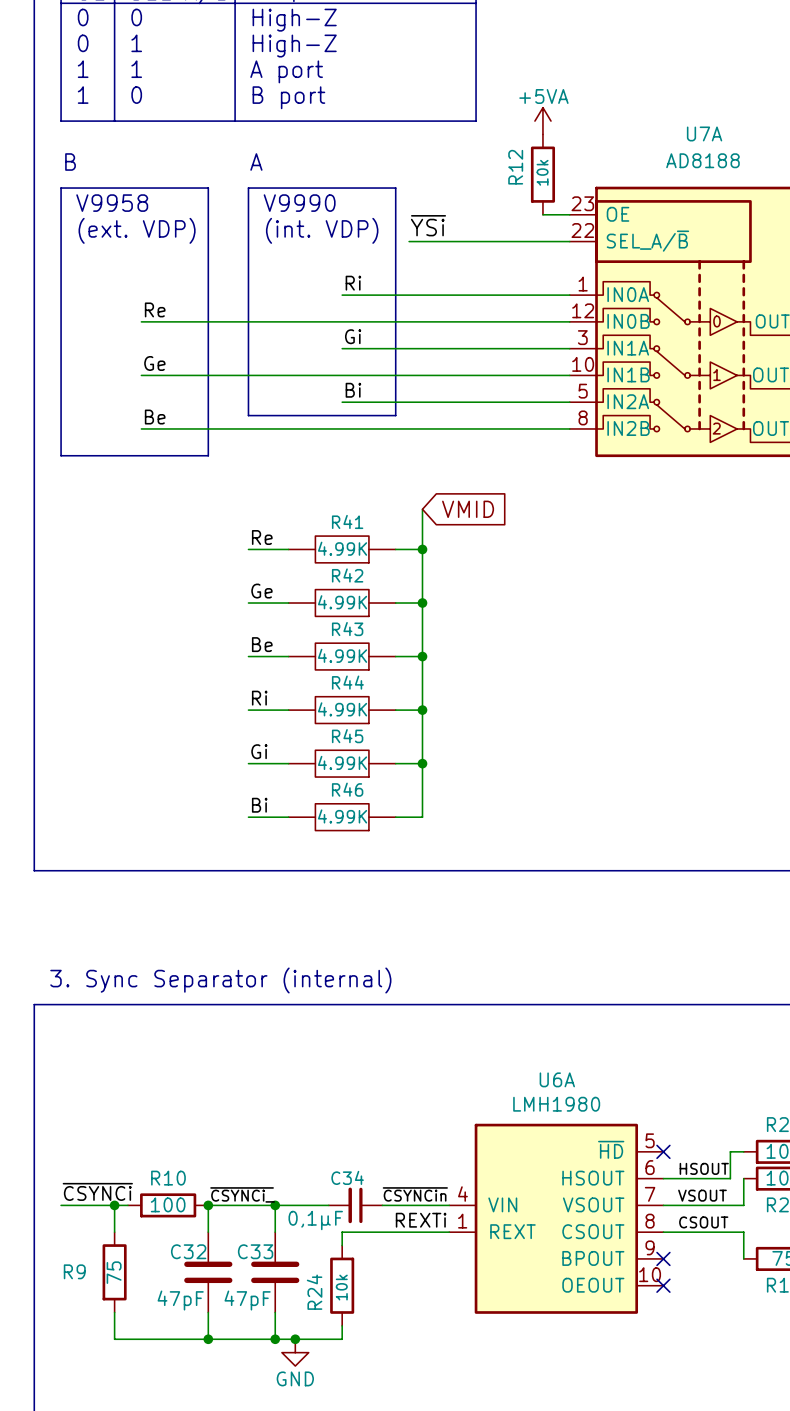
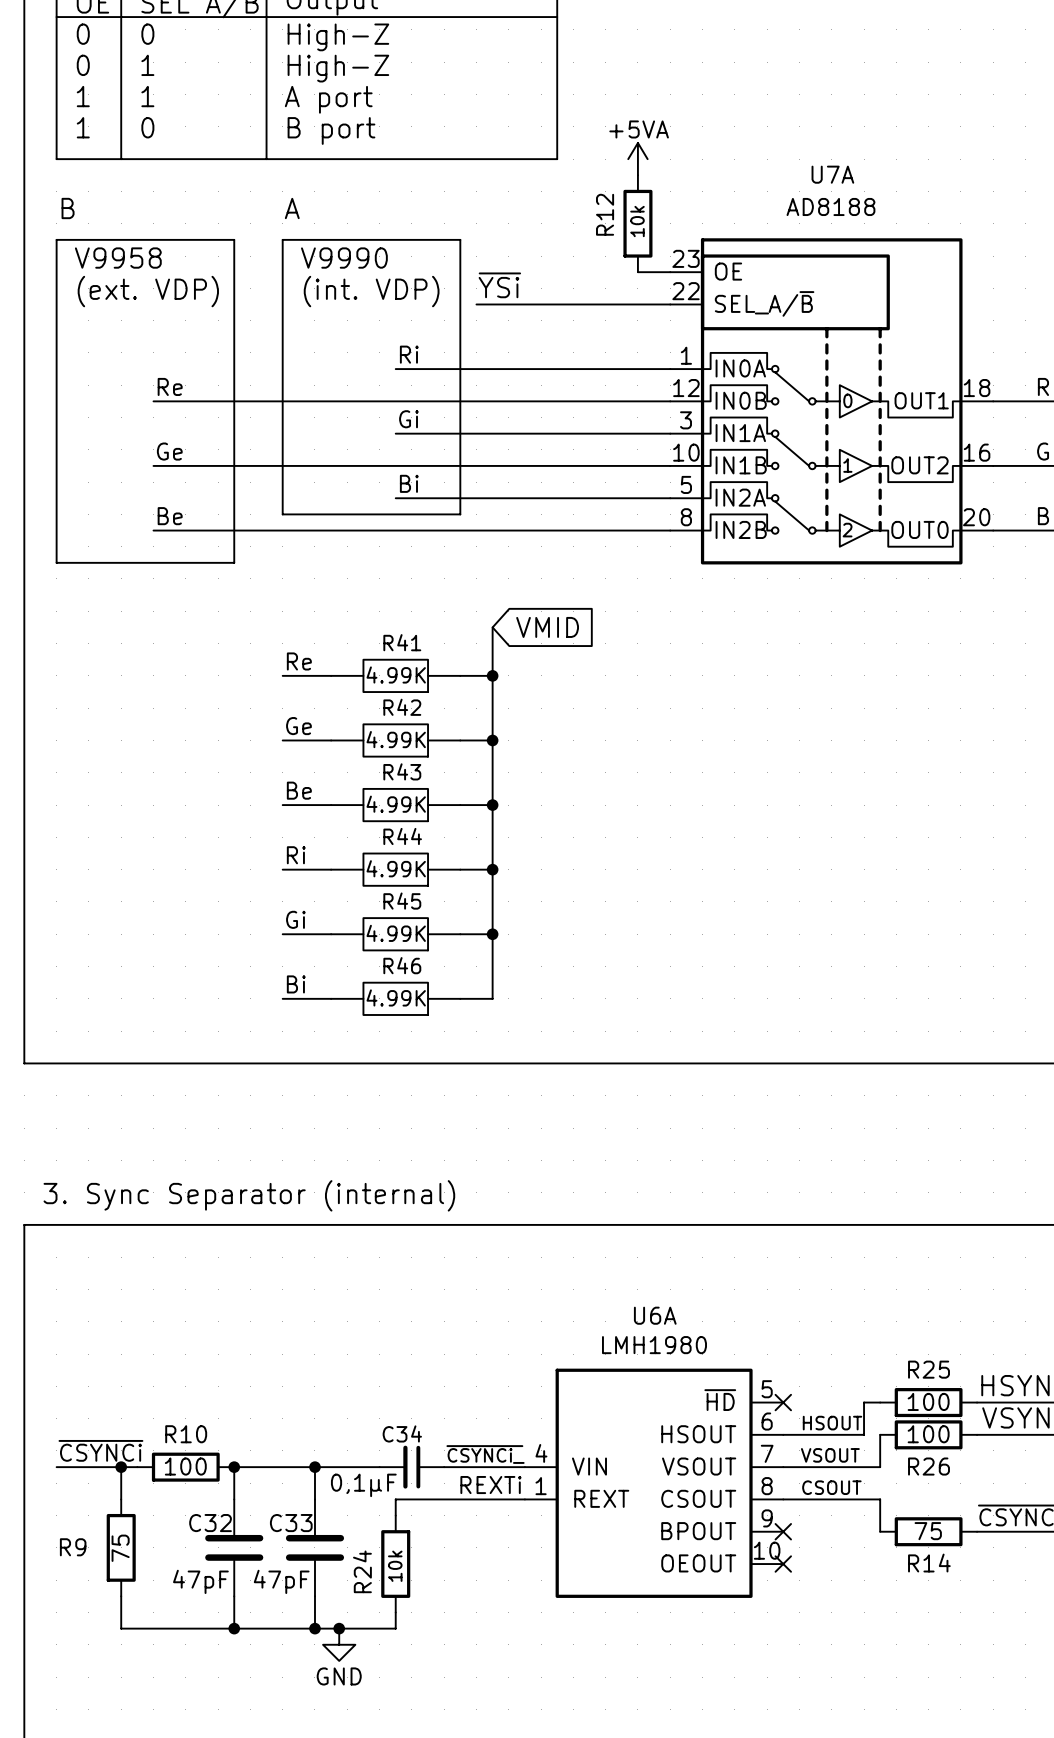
label: ~{CSYNCi_} (242, 1194) -> none
label: ~{CSYNCin} (415, 1194) -> ~{CSYNCi_} (485, 1454)

